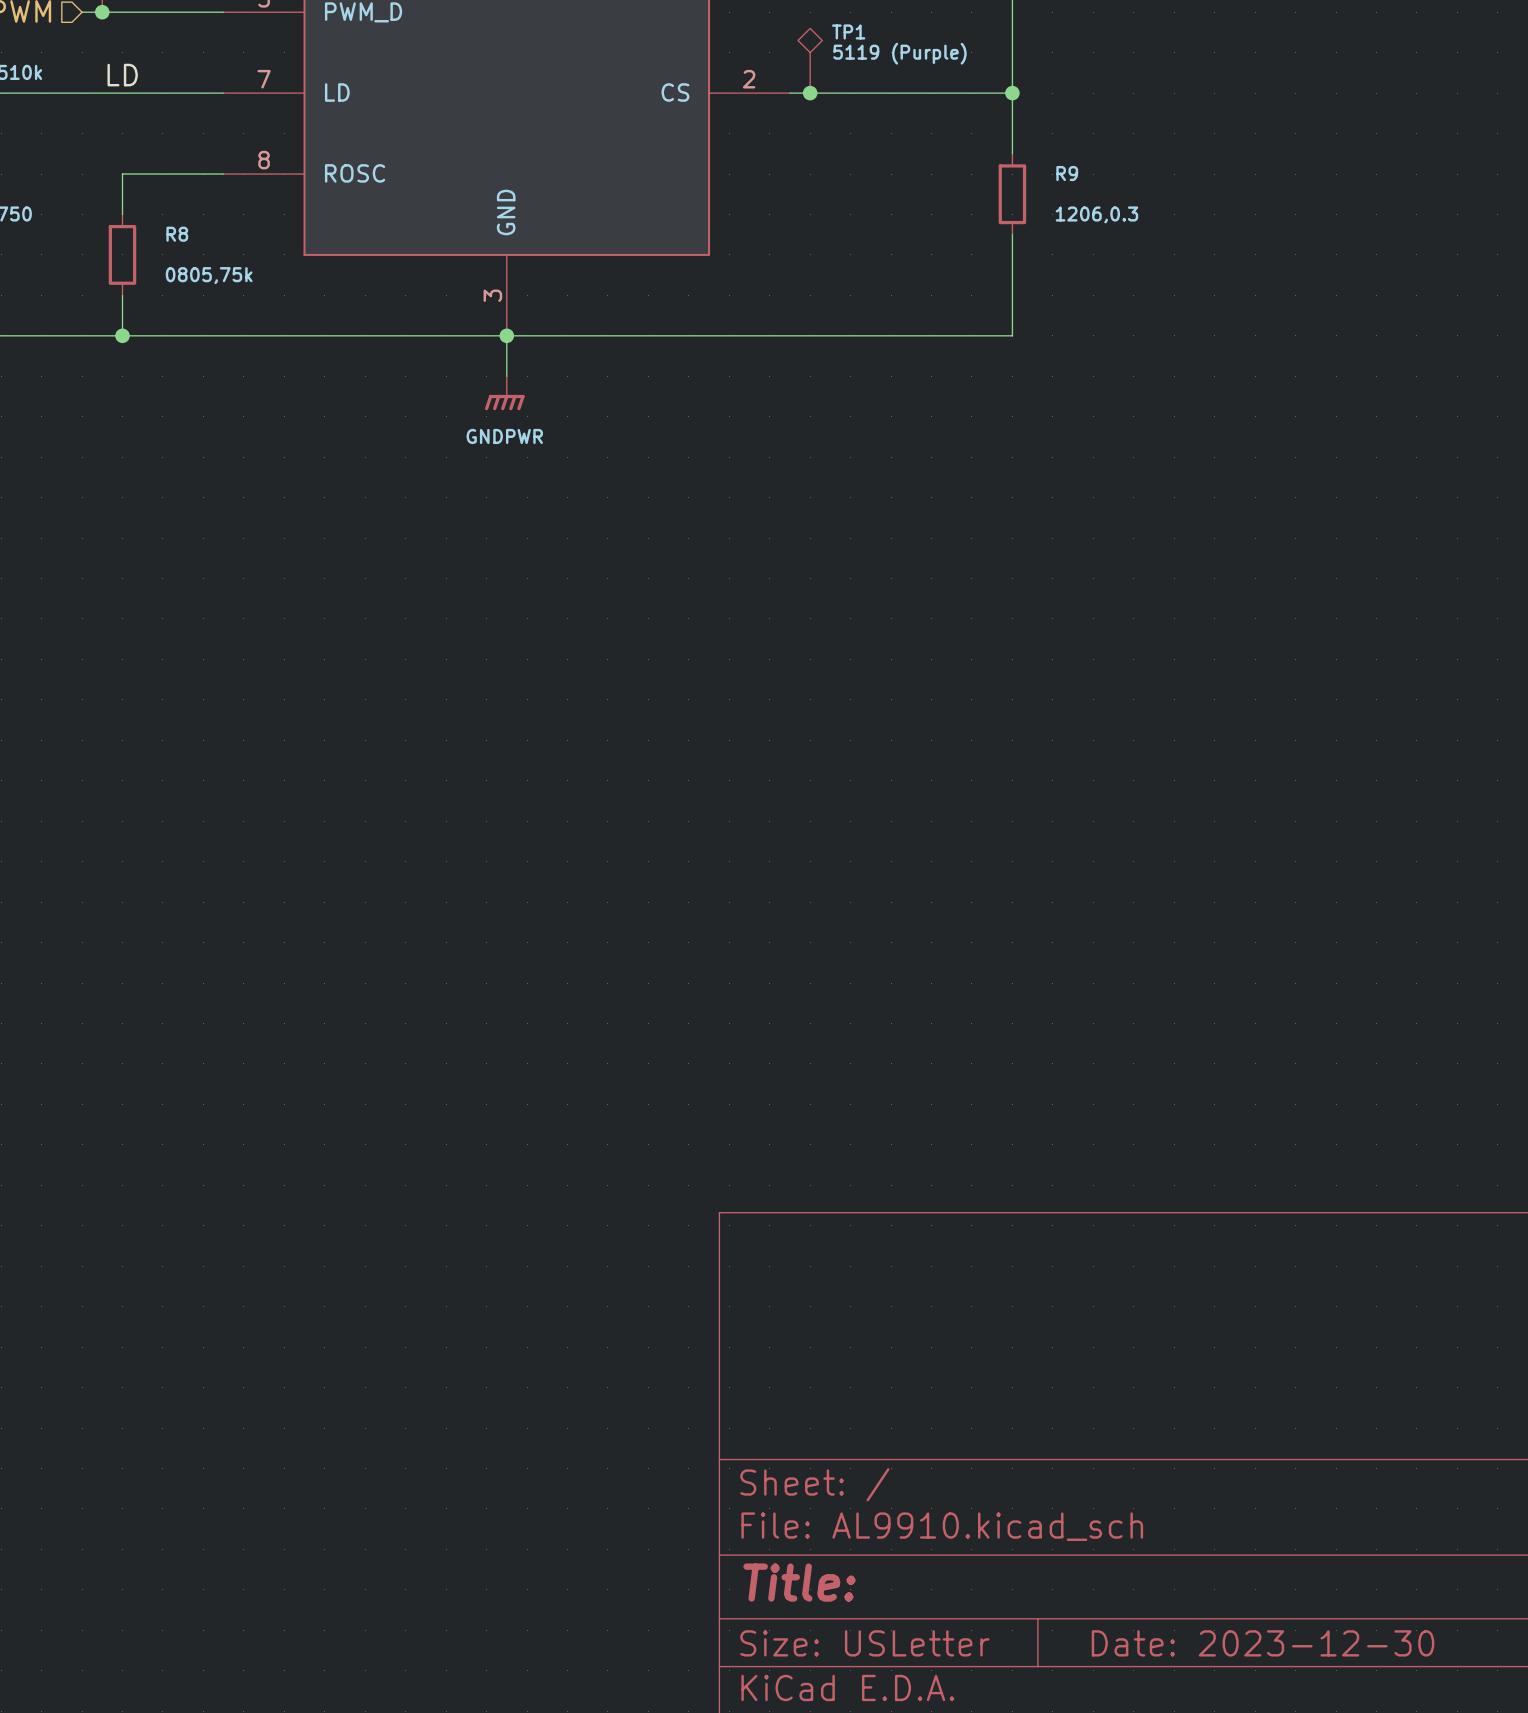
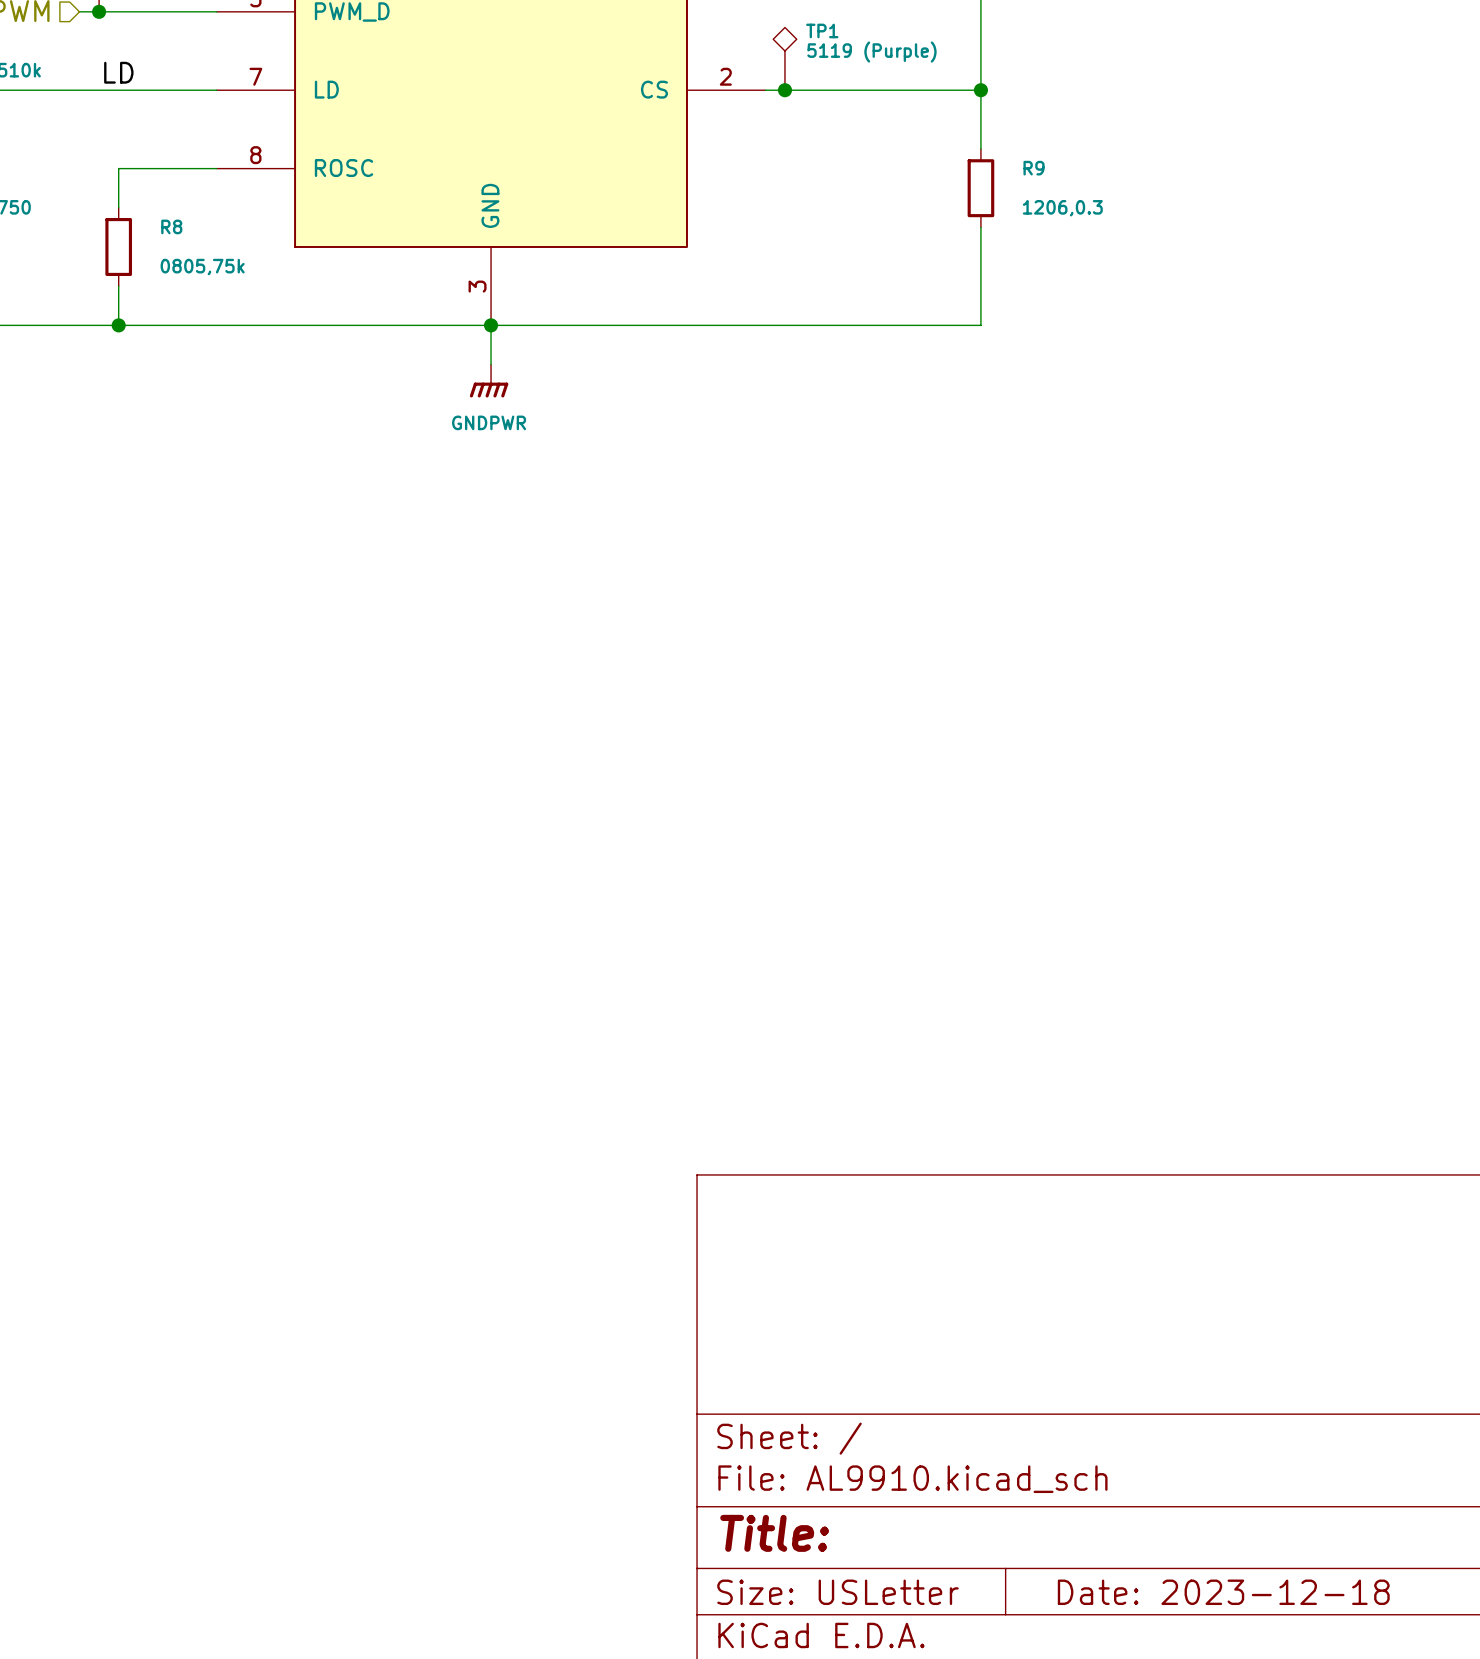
title block: Date: 2023-12-30 (1263, 1643) -> Date: 2023-12-18 (1223, 1592)

